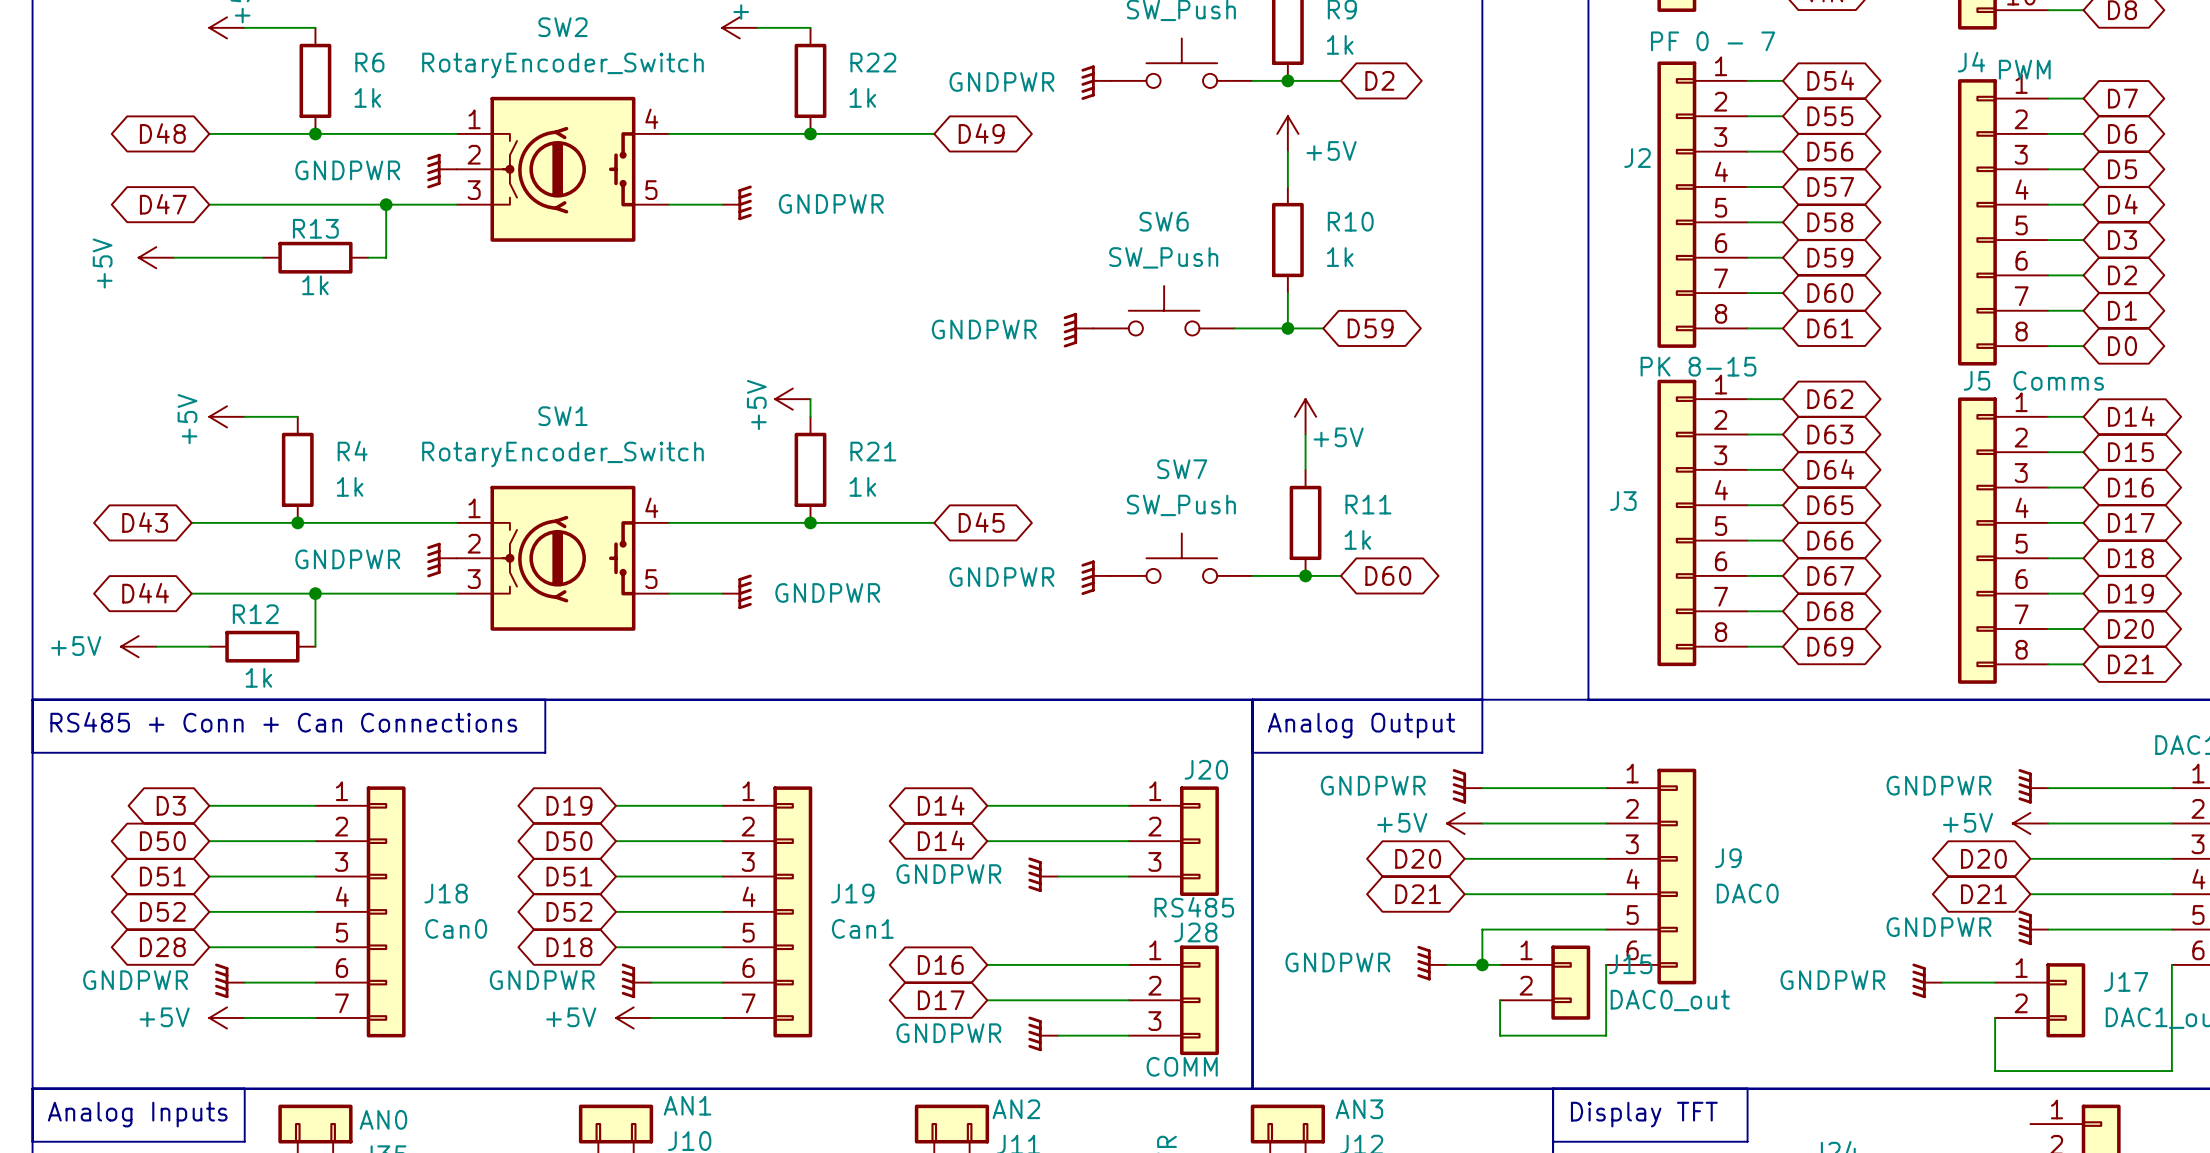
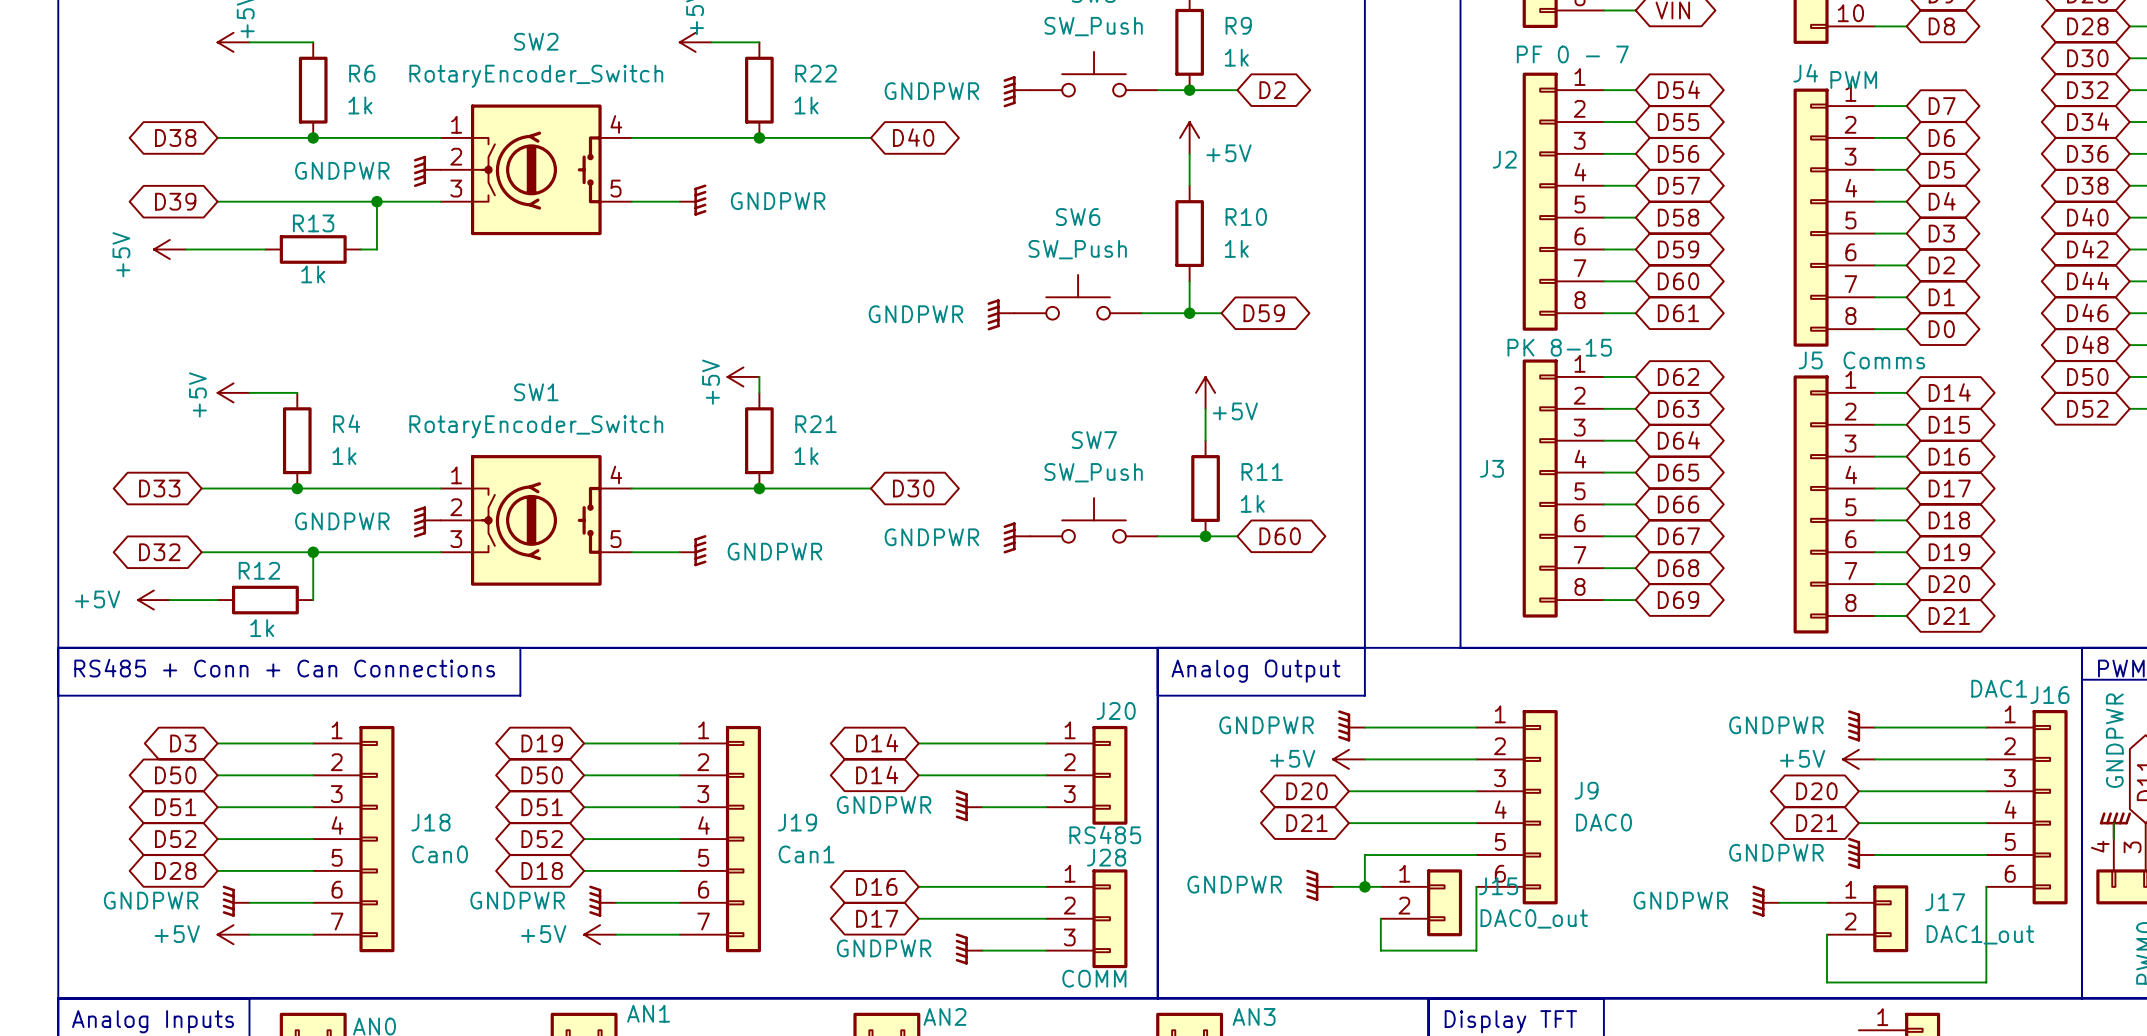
global label: D48 (162, 133) -> D38 (175, 137)
global label: D49 (981, 133) -> D40 (913, 137)
global label: D47 (163, 204) -> D39 (175, 201)
global label: D43 (145, 522) -> D33 (159, 488)
global label: D45 (981, 522) -> D30 (913, 488)
global label: D44 (145, 593) -> D32 (159, 552)

